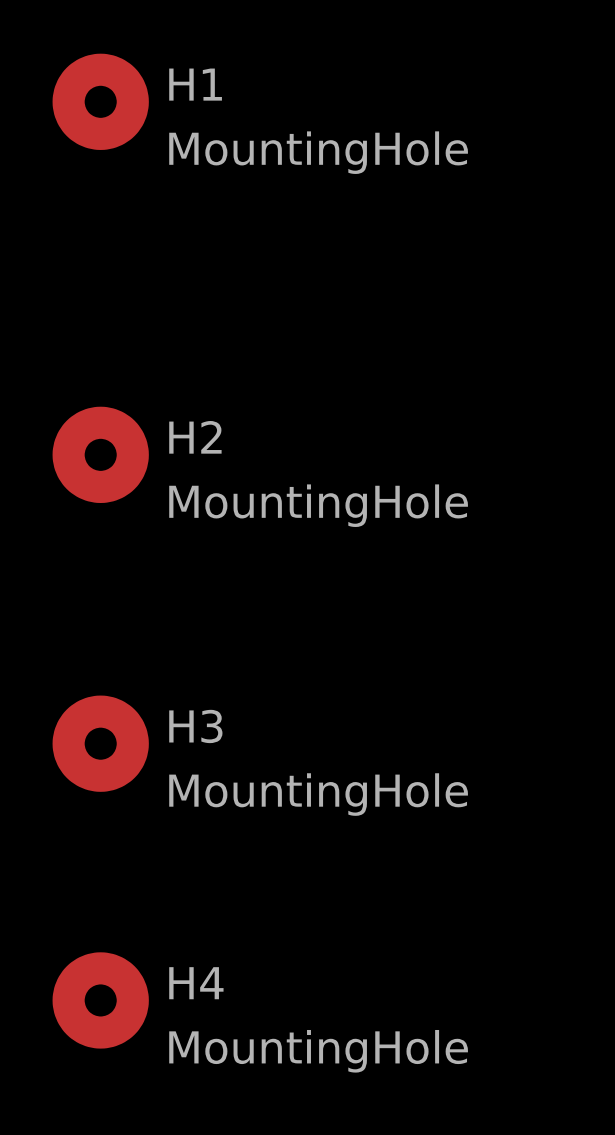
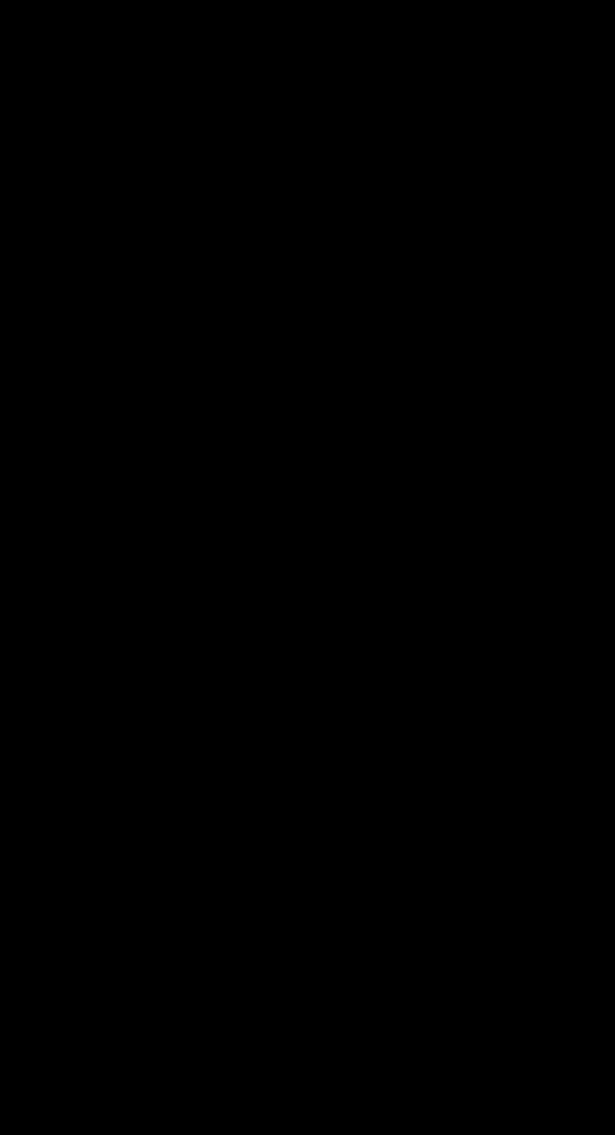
H1: MountingHole (100, 101) -> none
H2: MountingHole (100, 454) -> none
H3: MountingHole (100, 743) -> none
H4: MountingHole (100, 1000) -> none

